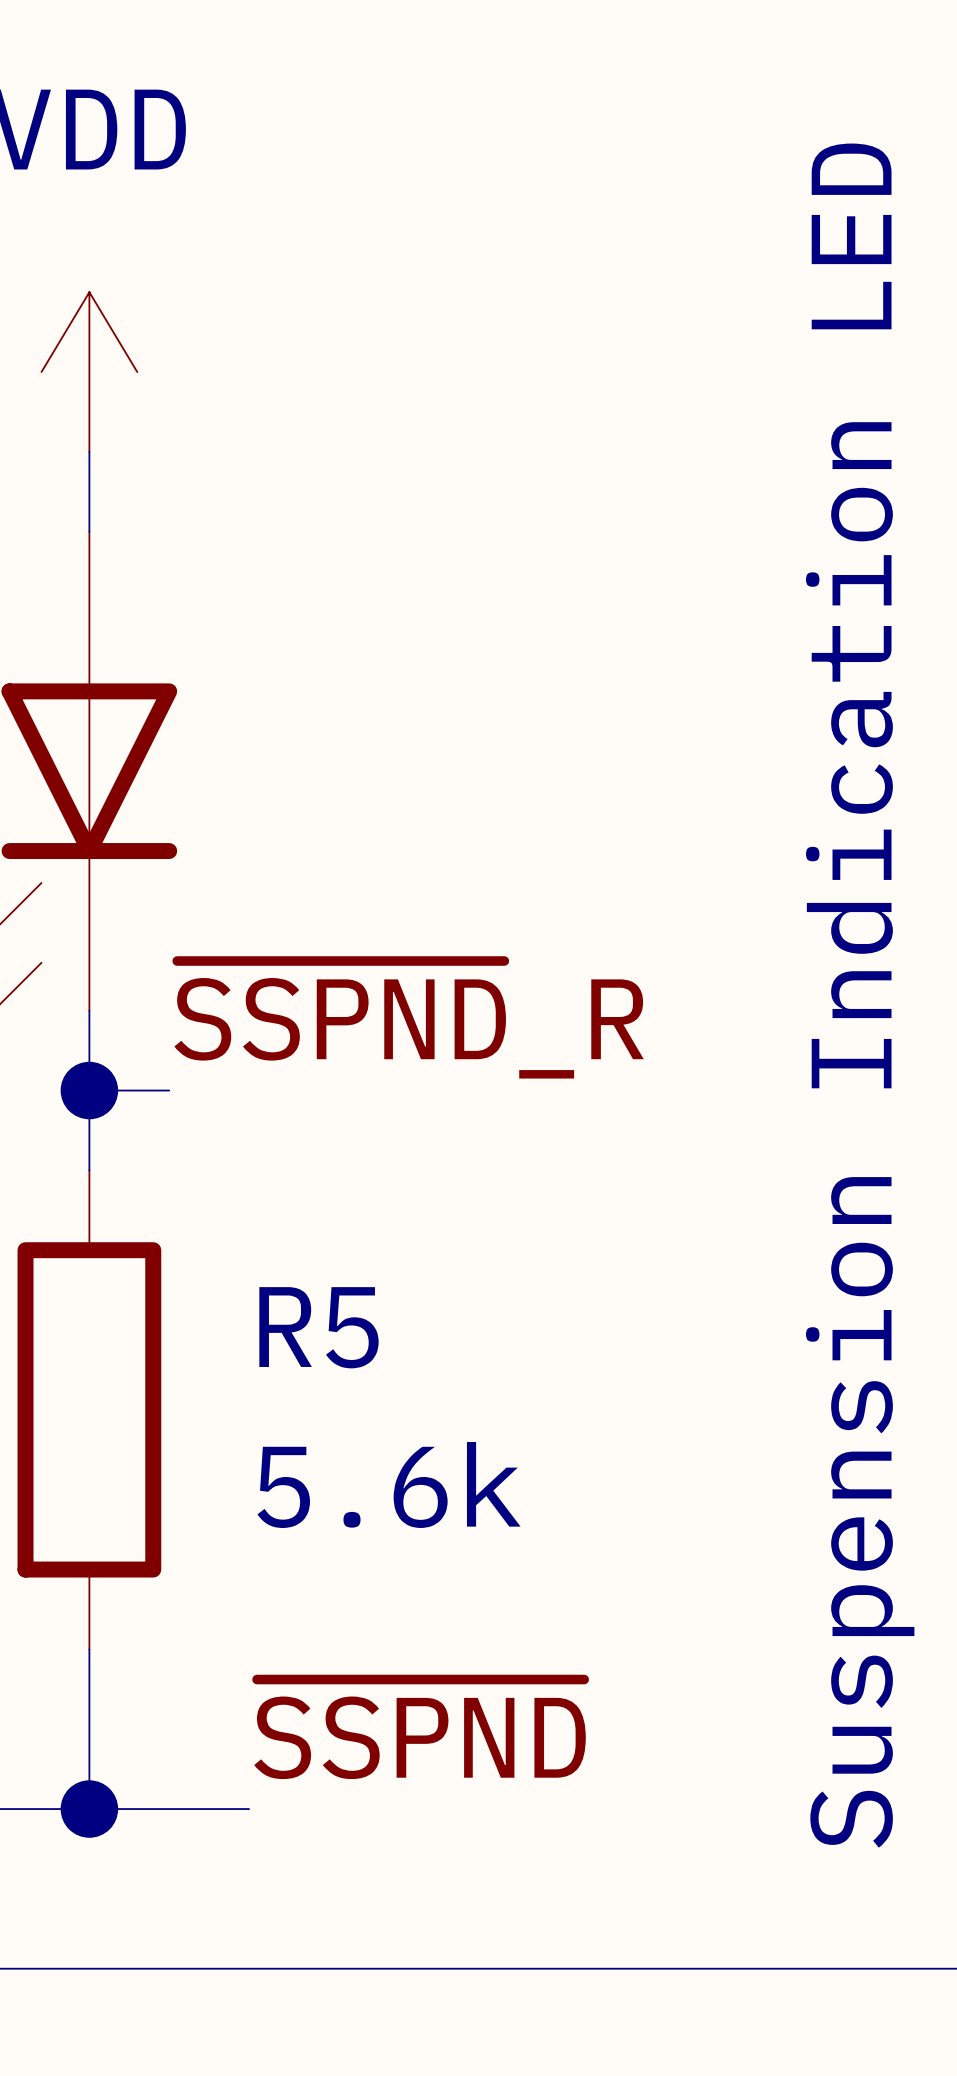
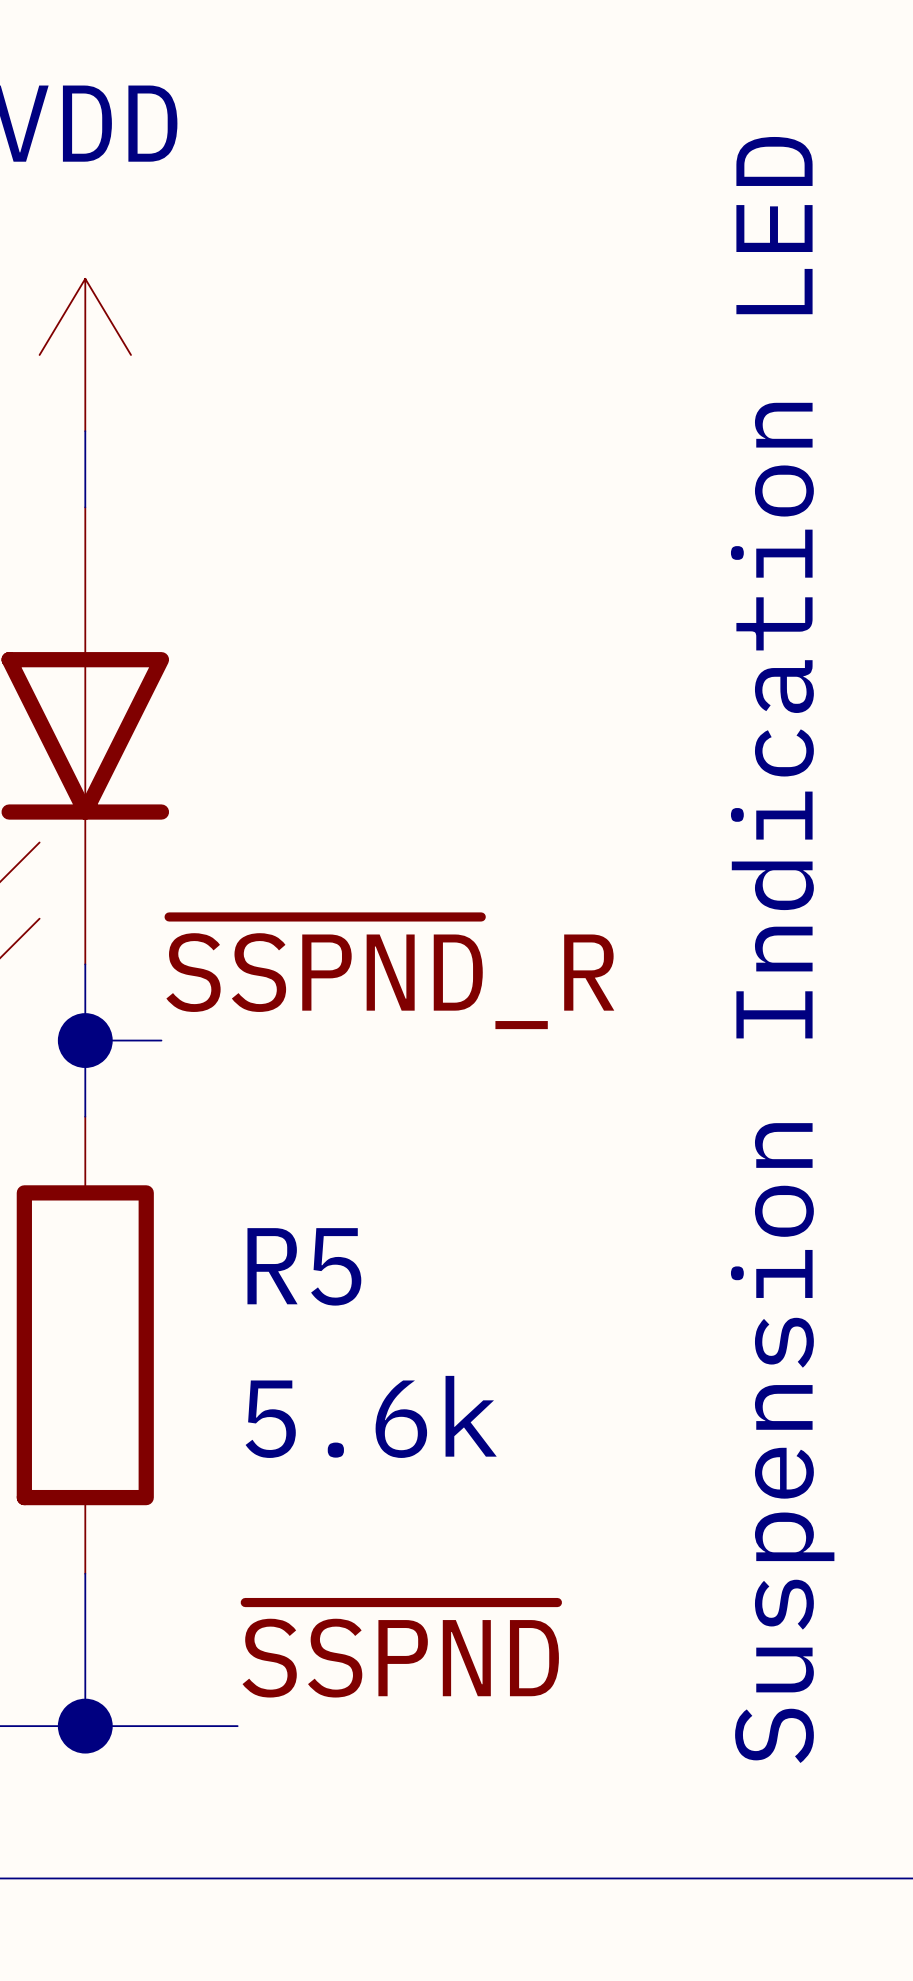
text position: Suspension Indication LED (860, 995) -> Suspension Indication LED (782, 949)

